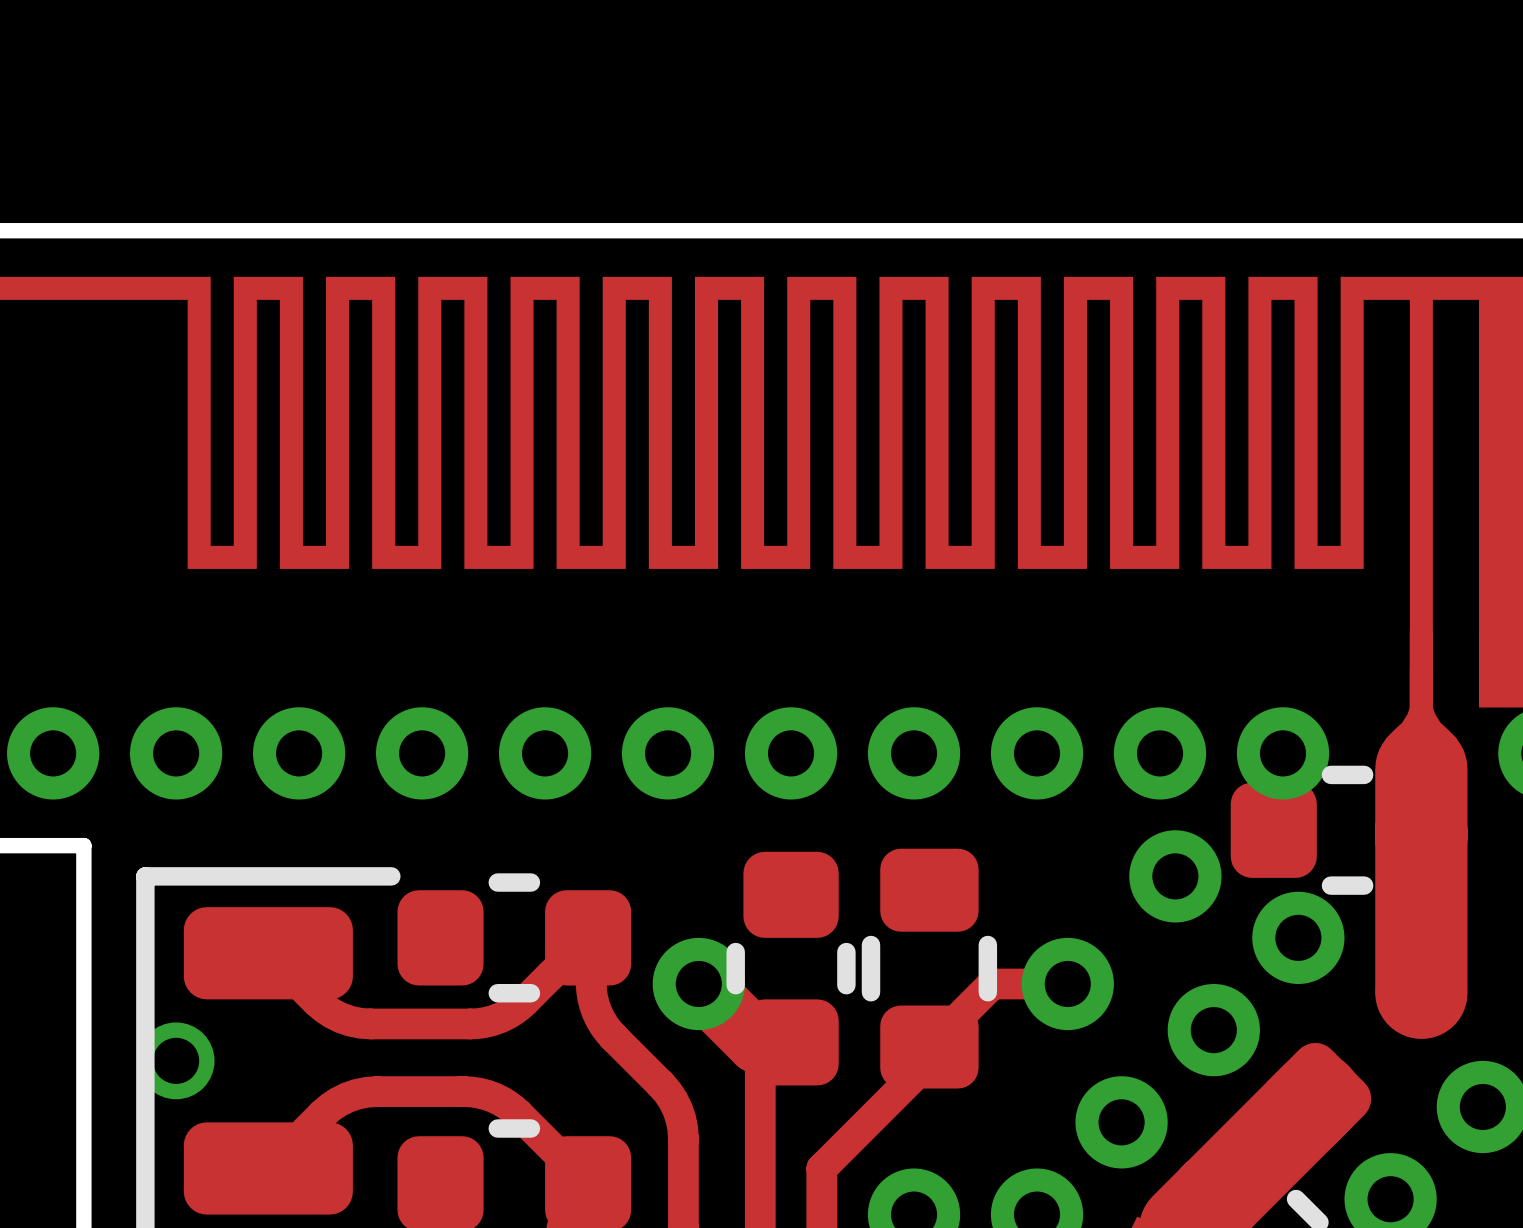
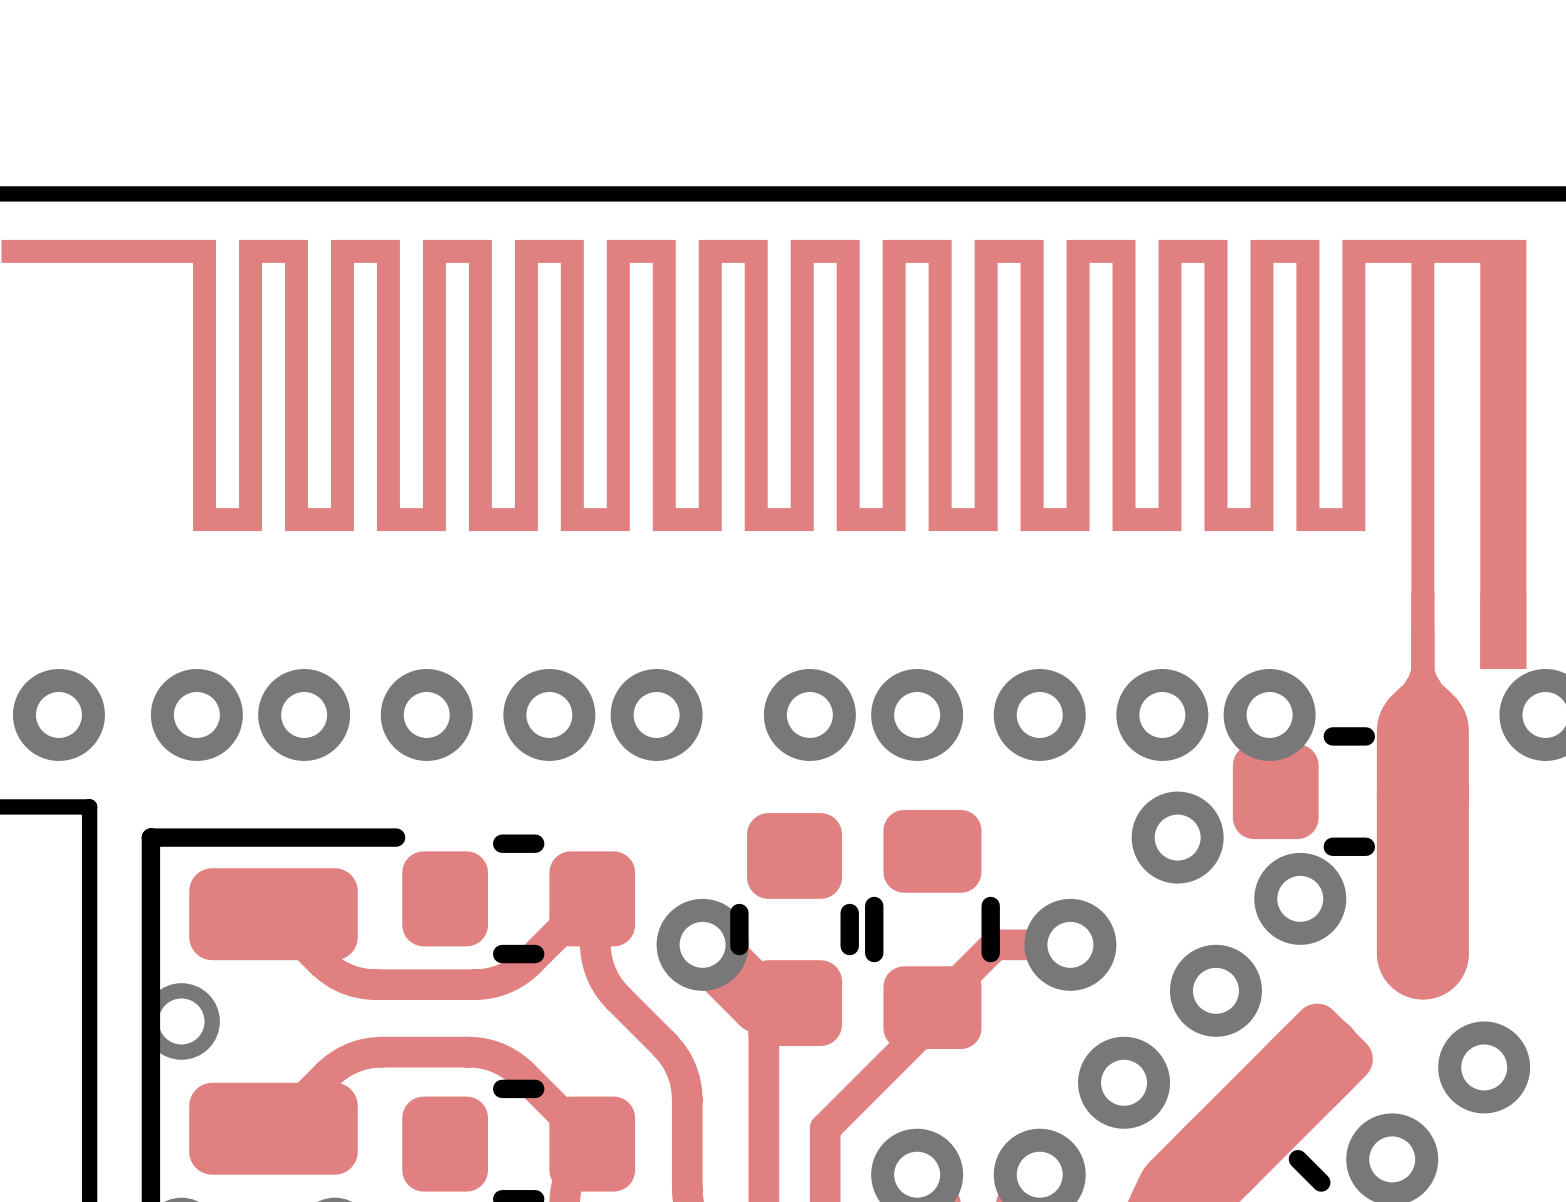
via position: (176, 753) -> (196, 714)
via position: (668, 753) -> (656, 714)
via position: (791, 753) -> (809, 714)
via position: (1283, 753) -> (1269, 714)

